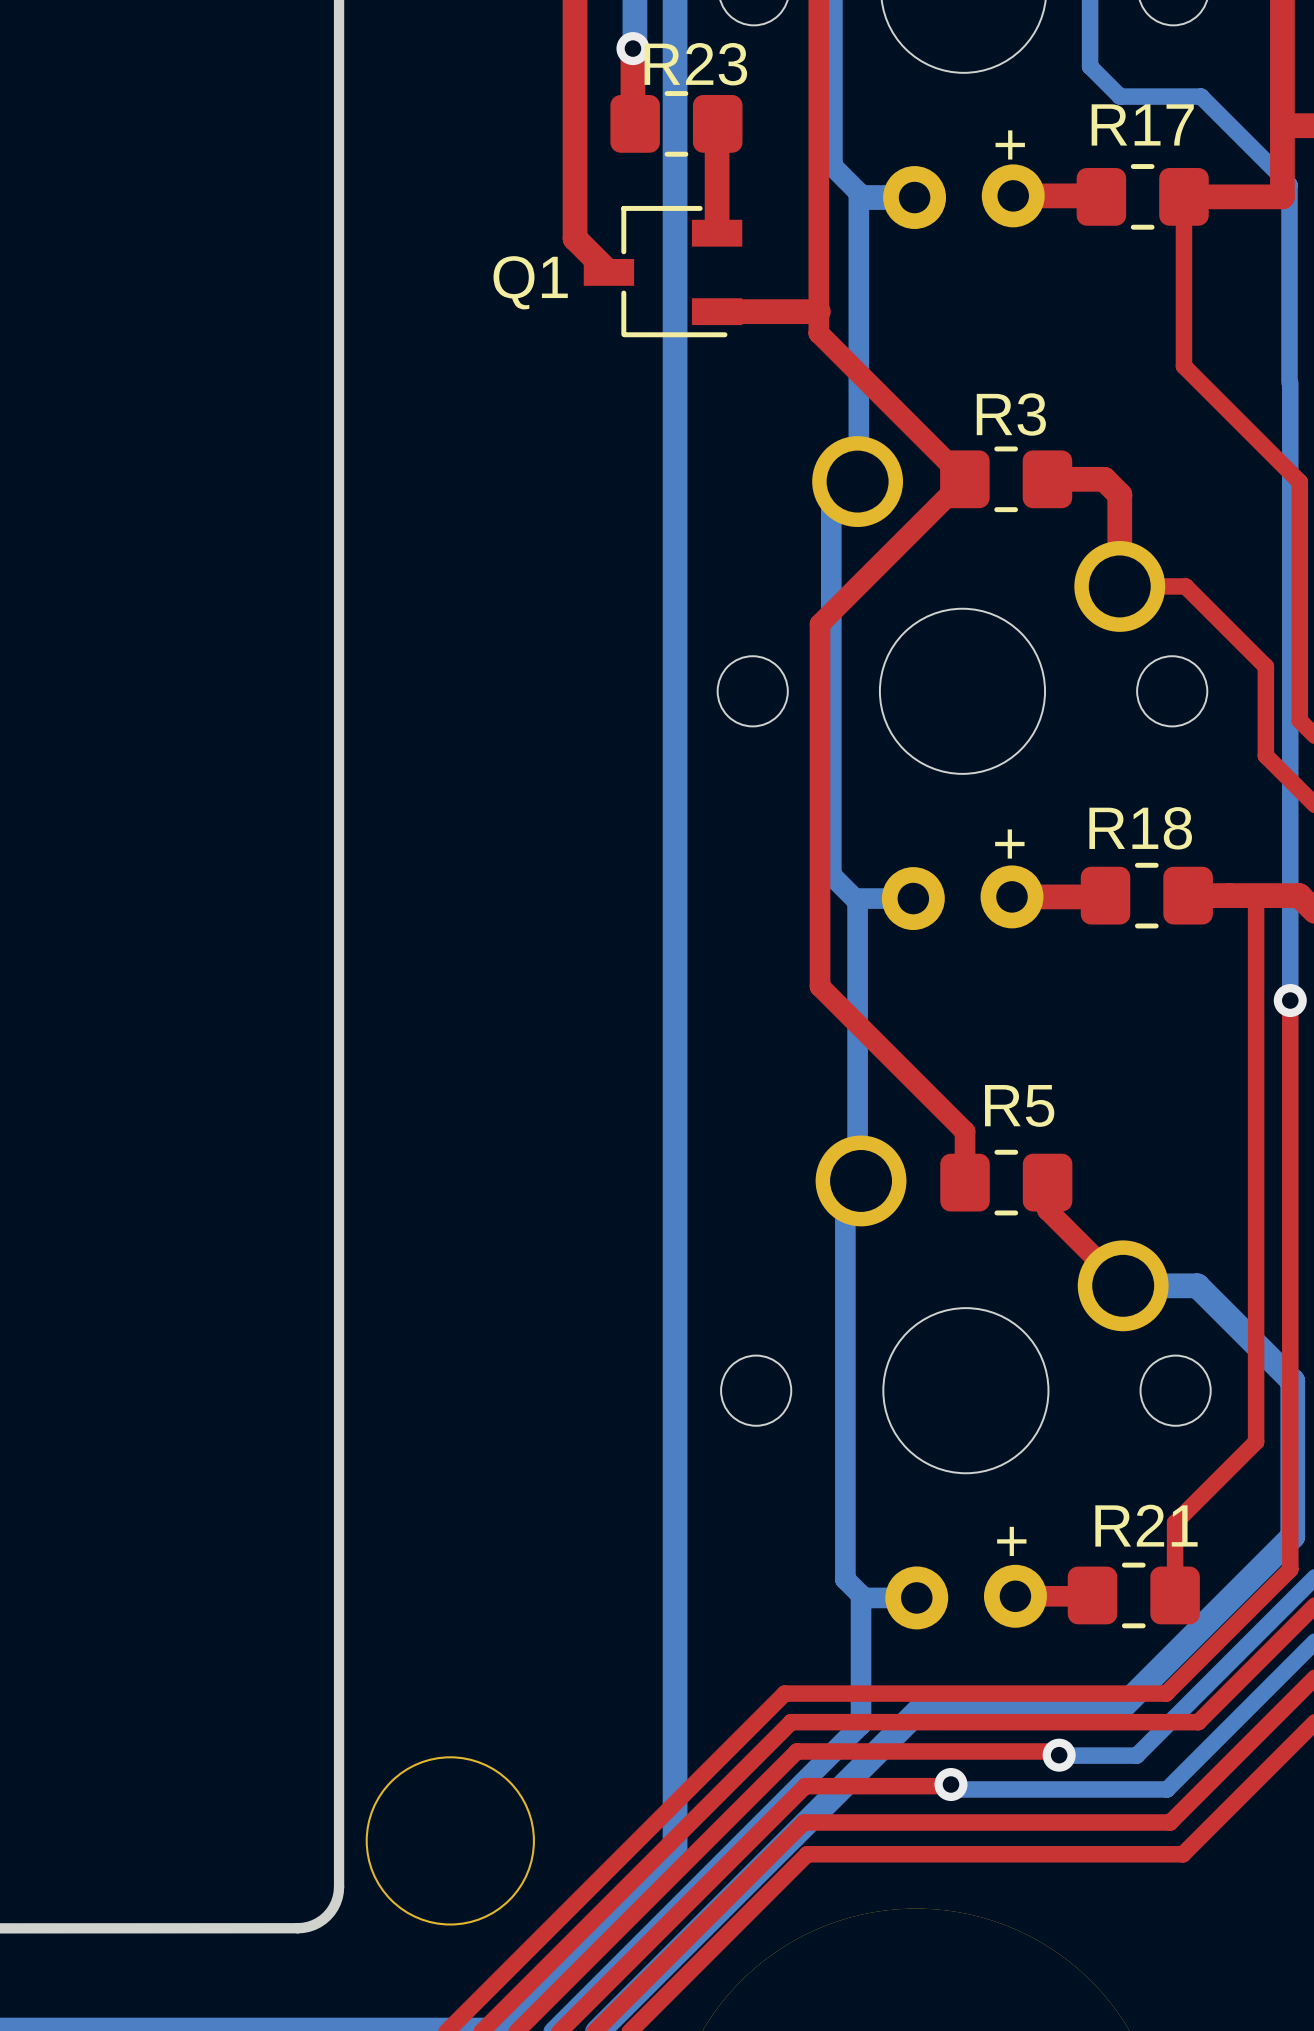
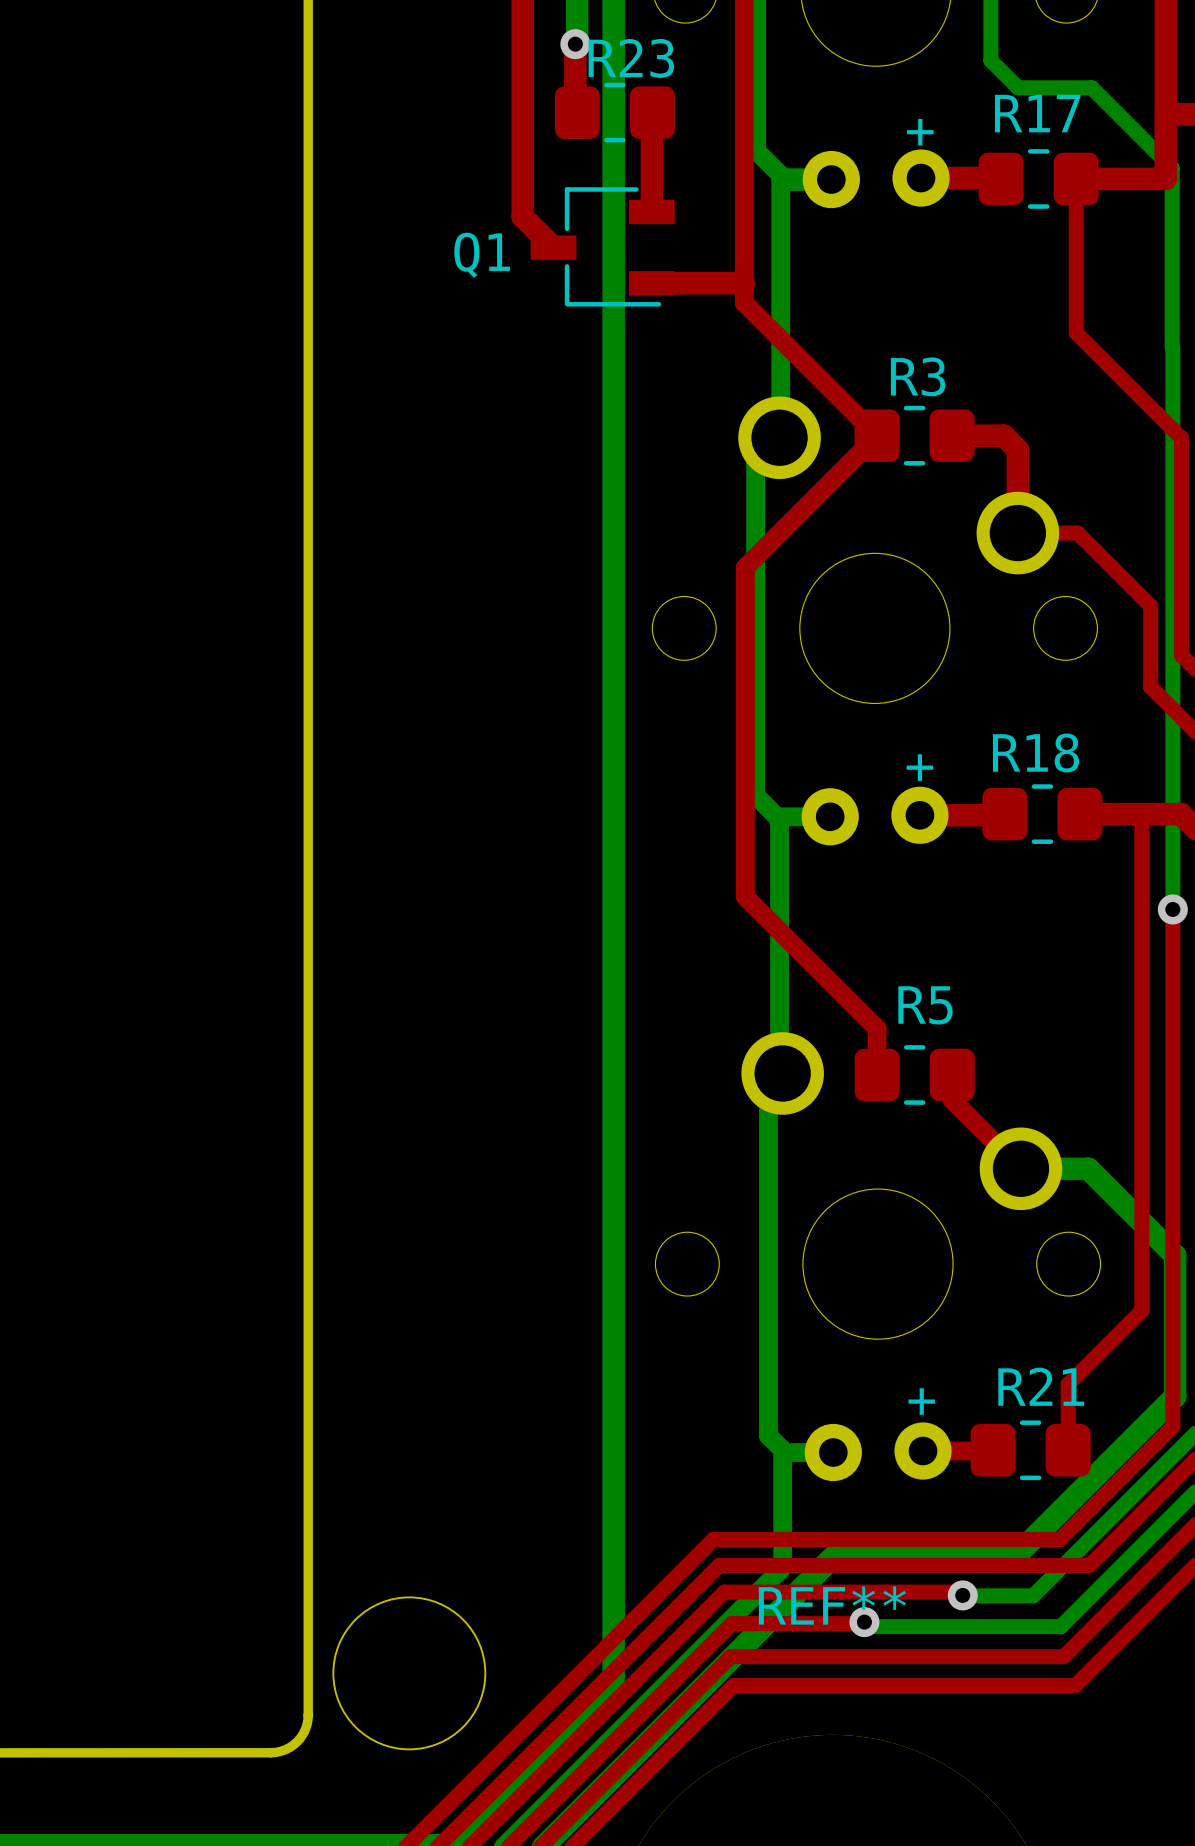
REF** name: none -> REF** (832, 1605)

